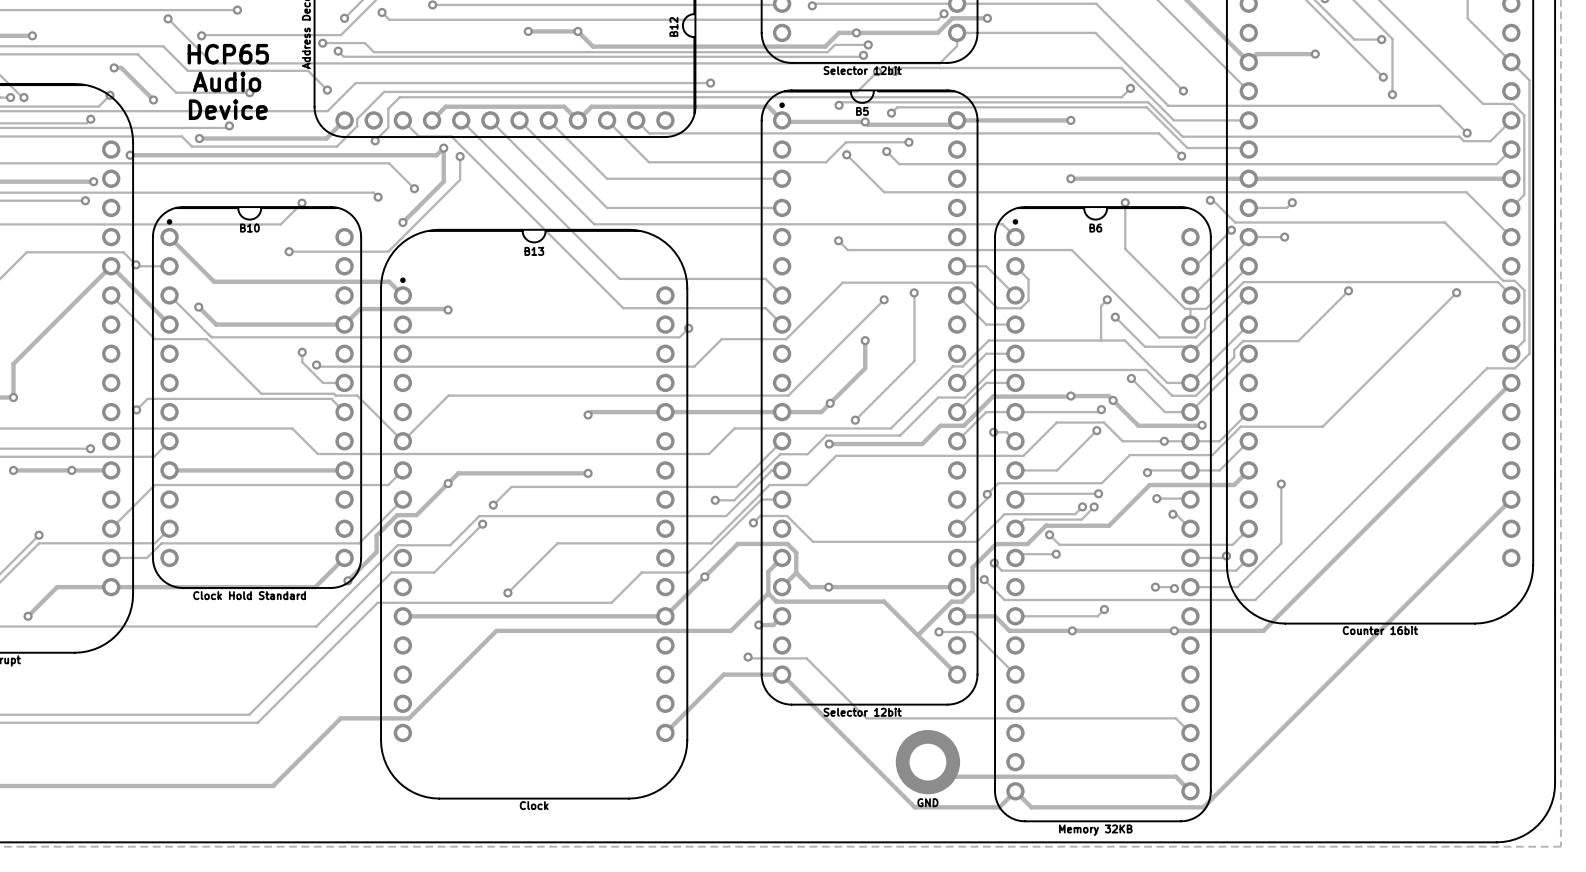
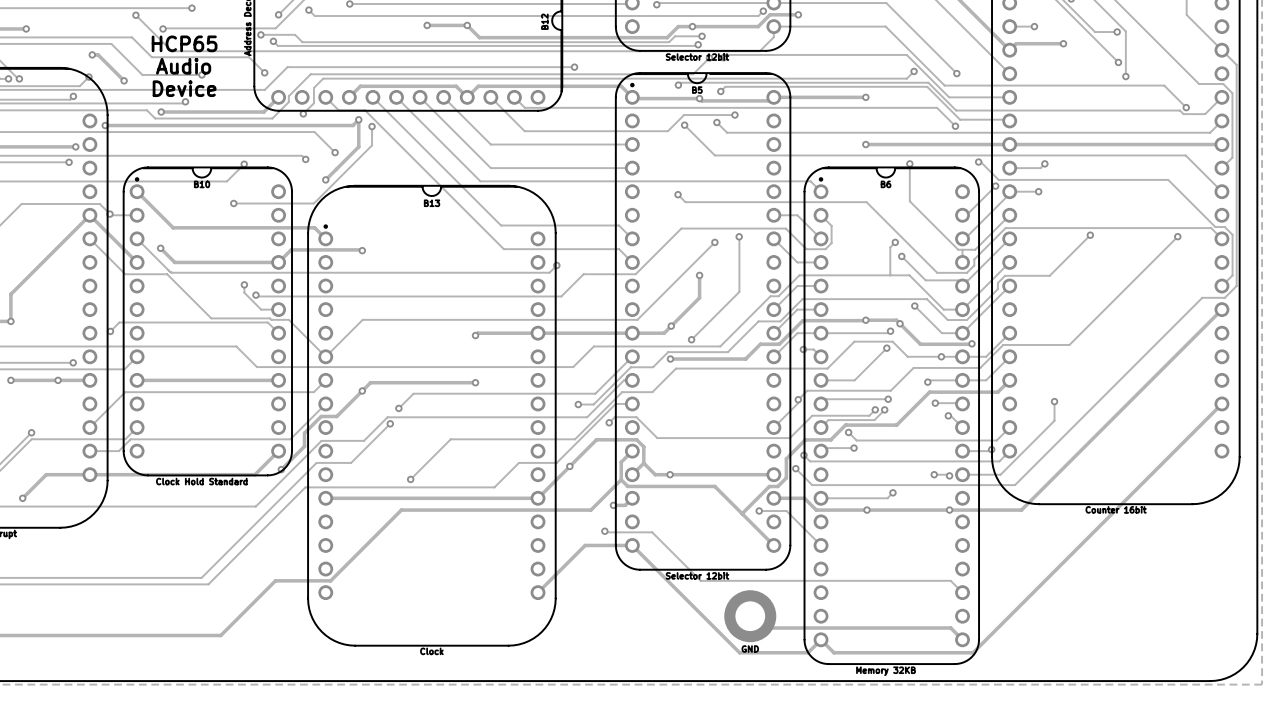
track: none -> (1009, 26) (1034, 26)
via: none -> (1034, 26)
track: (1281, 484) (1281, 543) -> (1054, 401) (1054, 420) (1035, 439)
via position: (1281, 484) -> (1054, 401)

